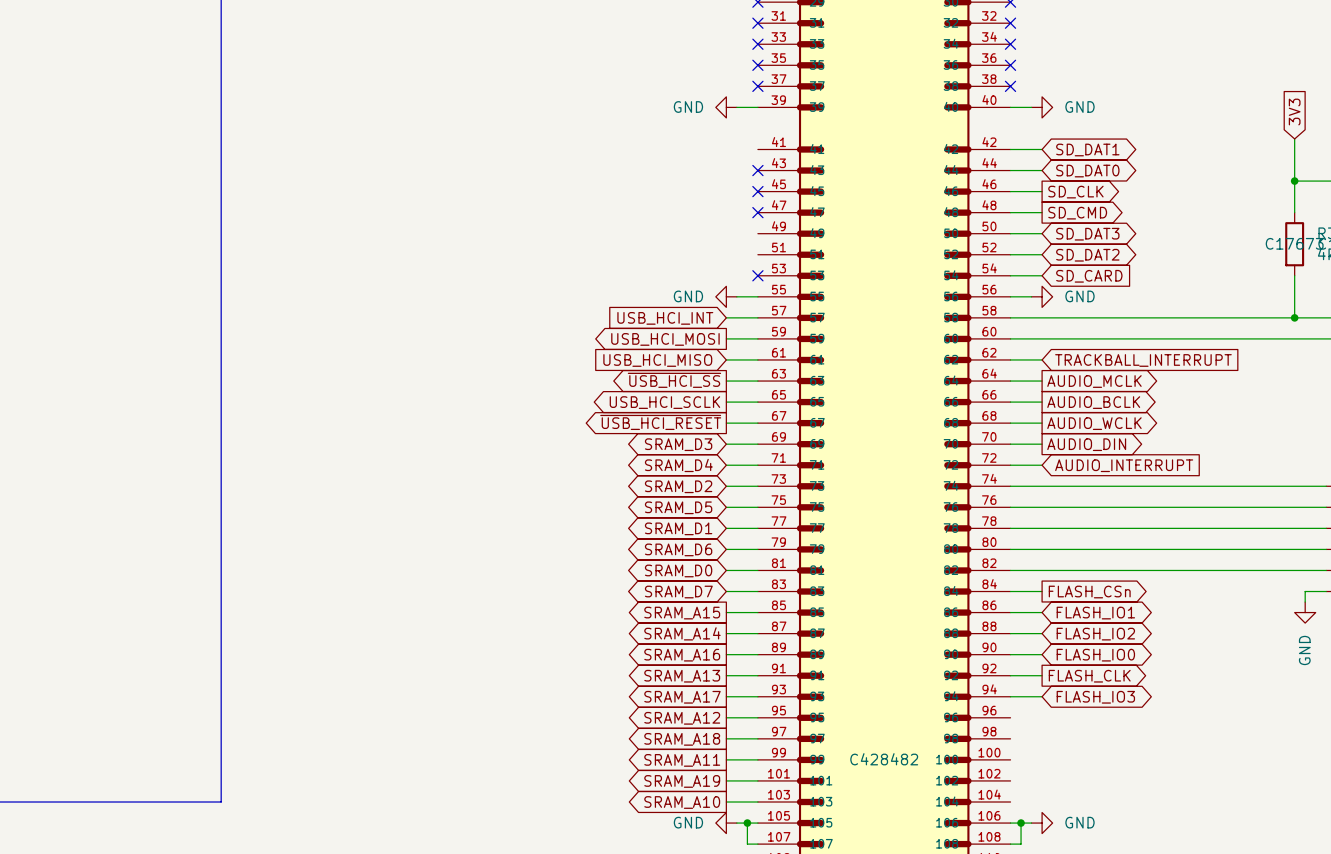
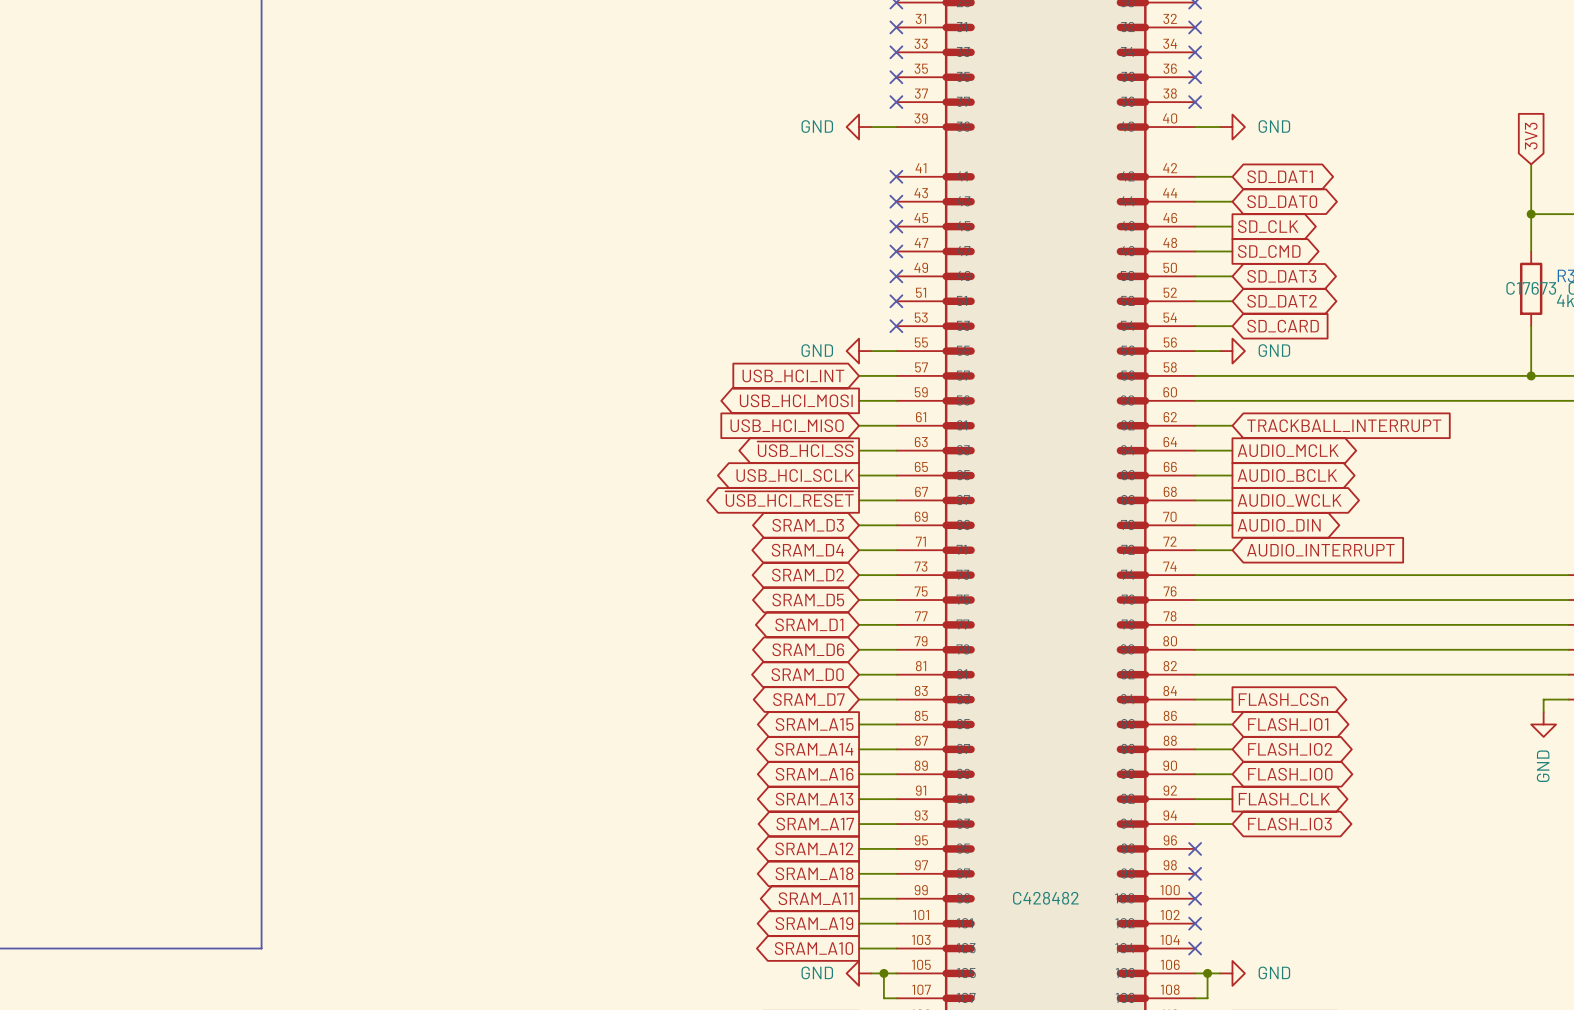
no-connect mark: none -> (896, 176)
no-connect mark: none -> (896, 276)
no-connect mark: none -> (896, 301)
no-connect mark: none -> (1195, 848)
no-connect mark: none -> (1195, 873)
no-connect mark: none -> (1195, 898)
no-connect mark: none -> (1195, 923)
no-connect mark: none -> (1195, 948)

